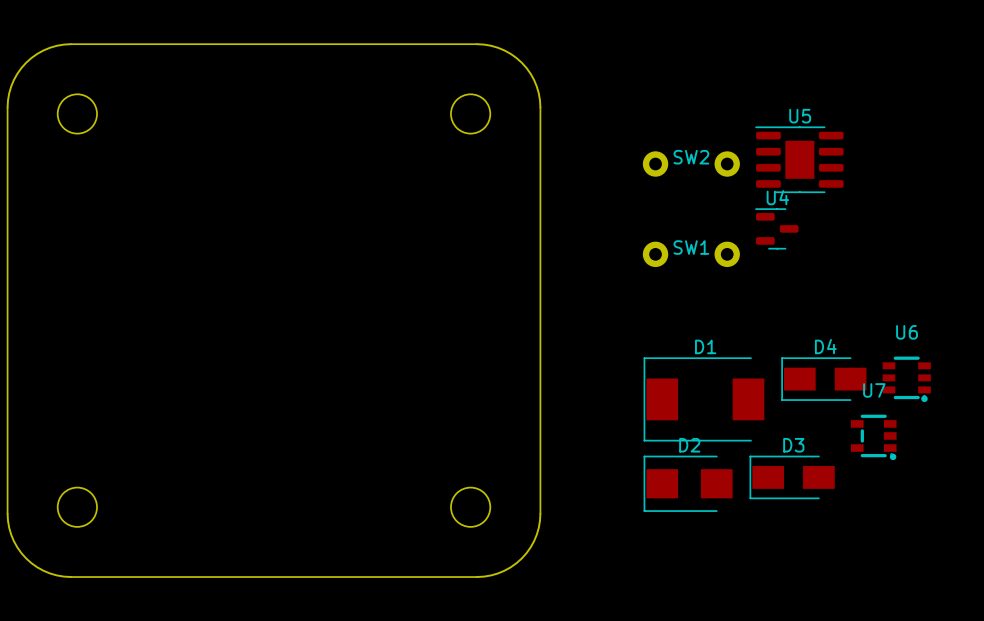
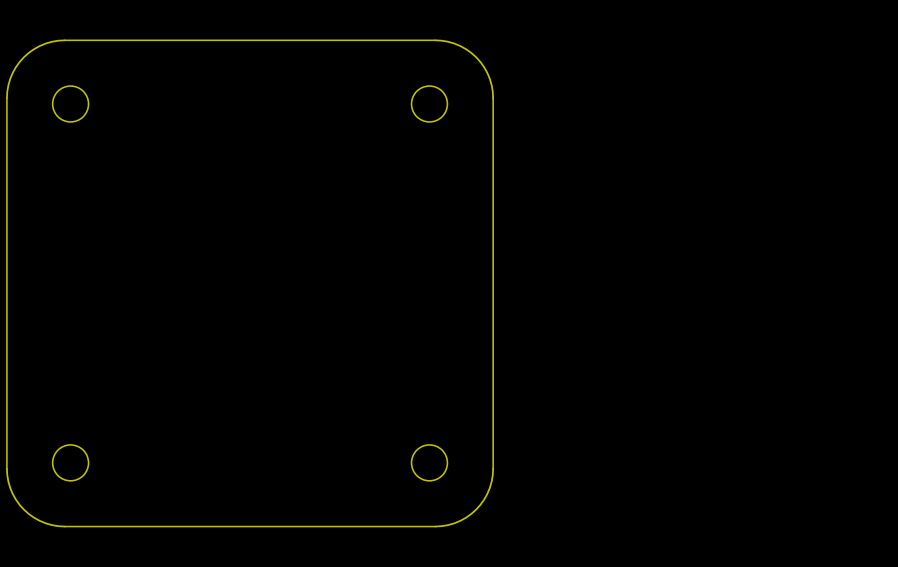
U5: (799, 159) -> none
SW2: (691, 164) -> none
U4: (776, 228) -> none
SW1: (691, 254) -> none
D4: (823, 379) -> none
U6: (906, 379) -> none
D1: (704, 399) -> none
U7: (873, 437) -> none
D3: (792, 477) -> none
D2: (688, 483) -> none

